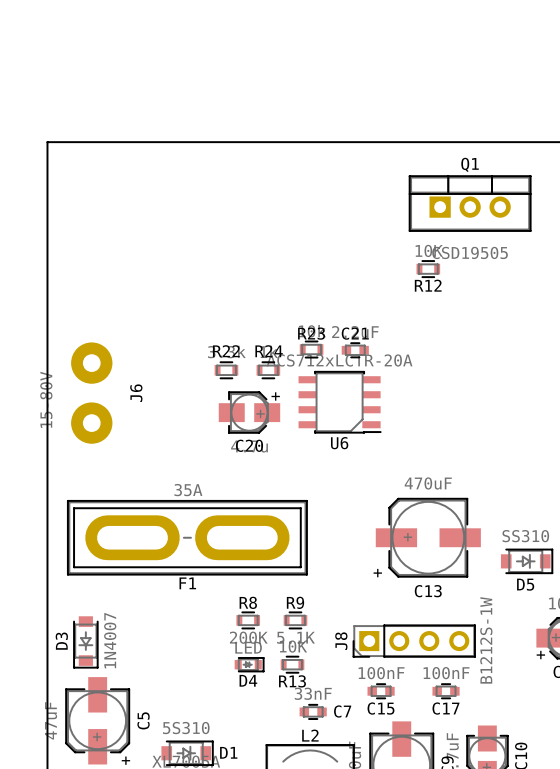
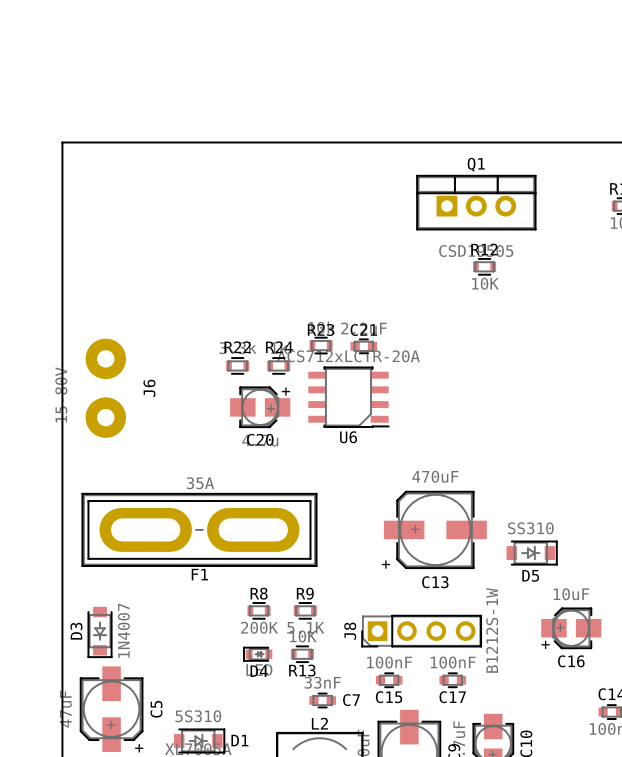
R12 value position: 10K (429, 250) -> 10K (485, 283)
R12 position: (428, 269) -> (484, 266)
R12 name position: R12 (428, 285) -> R12 (484, 249)
D4 rotation: 0° (249, 664) -> 180° (257, 654)

